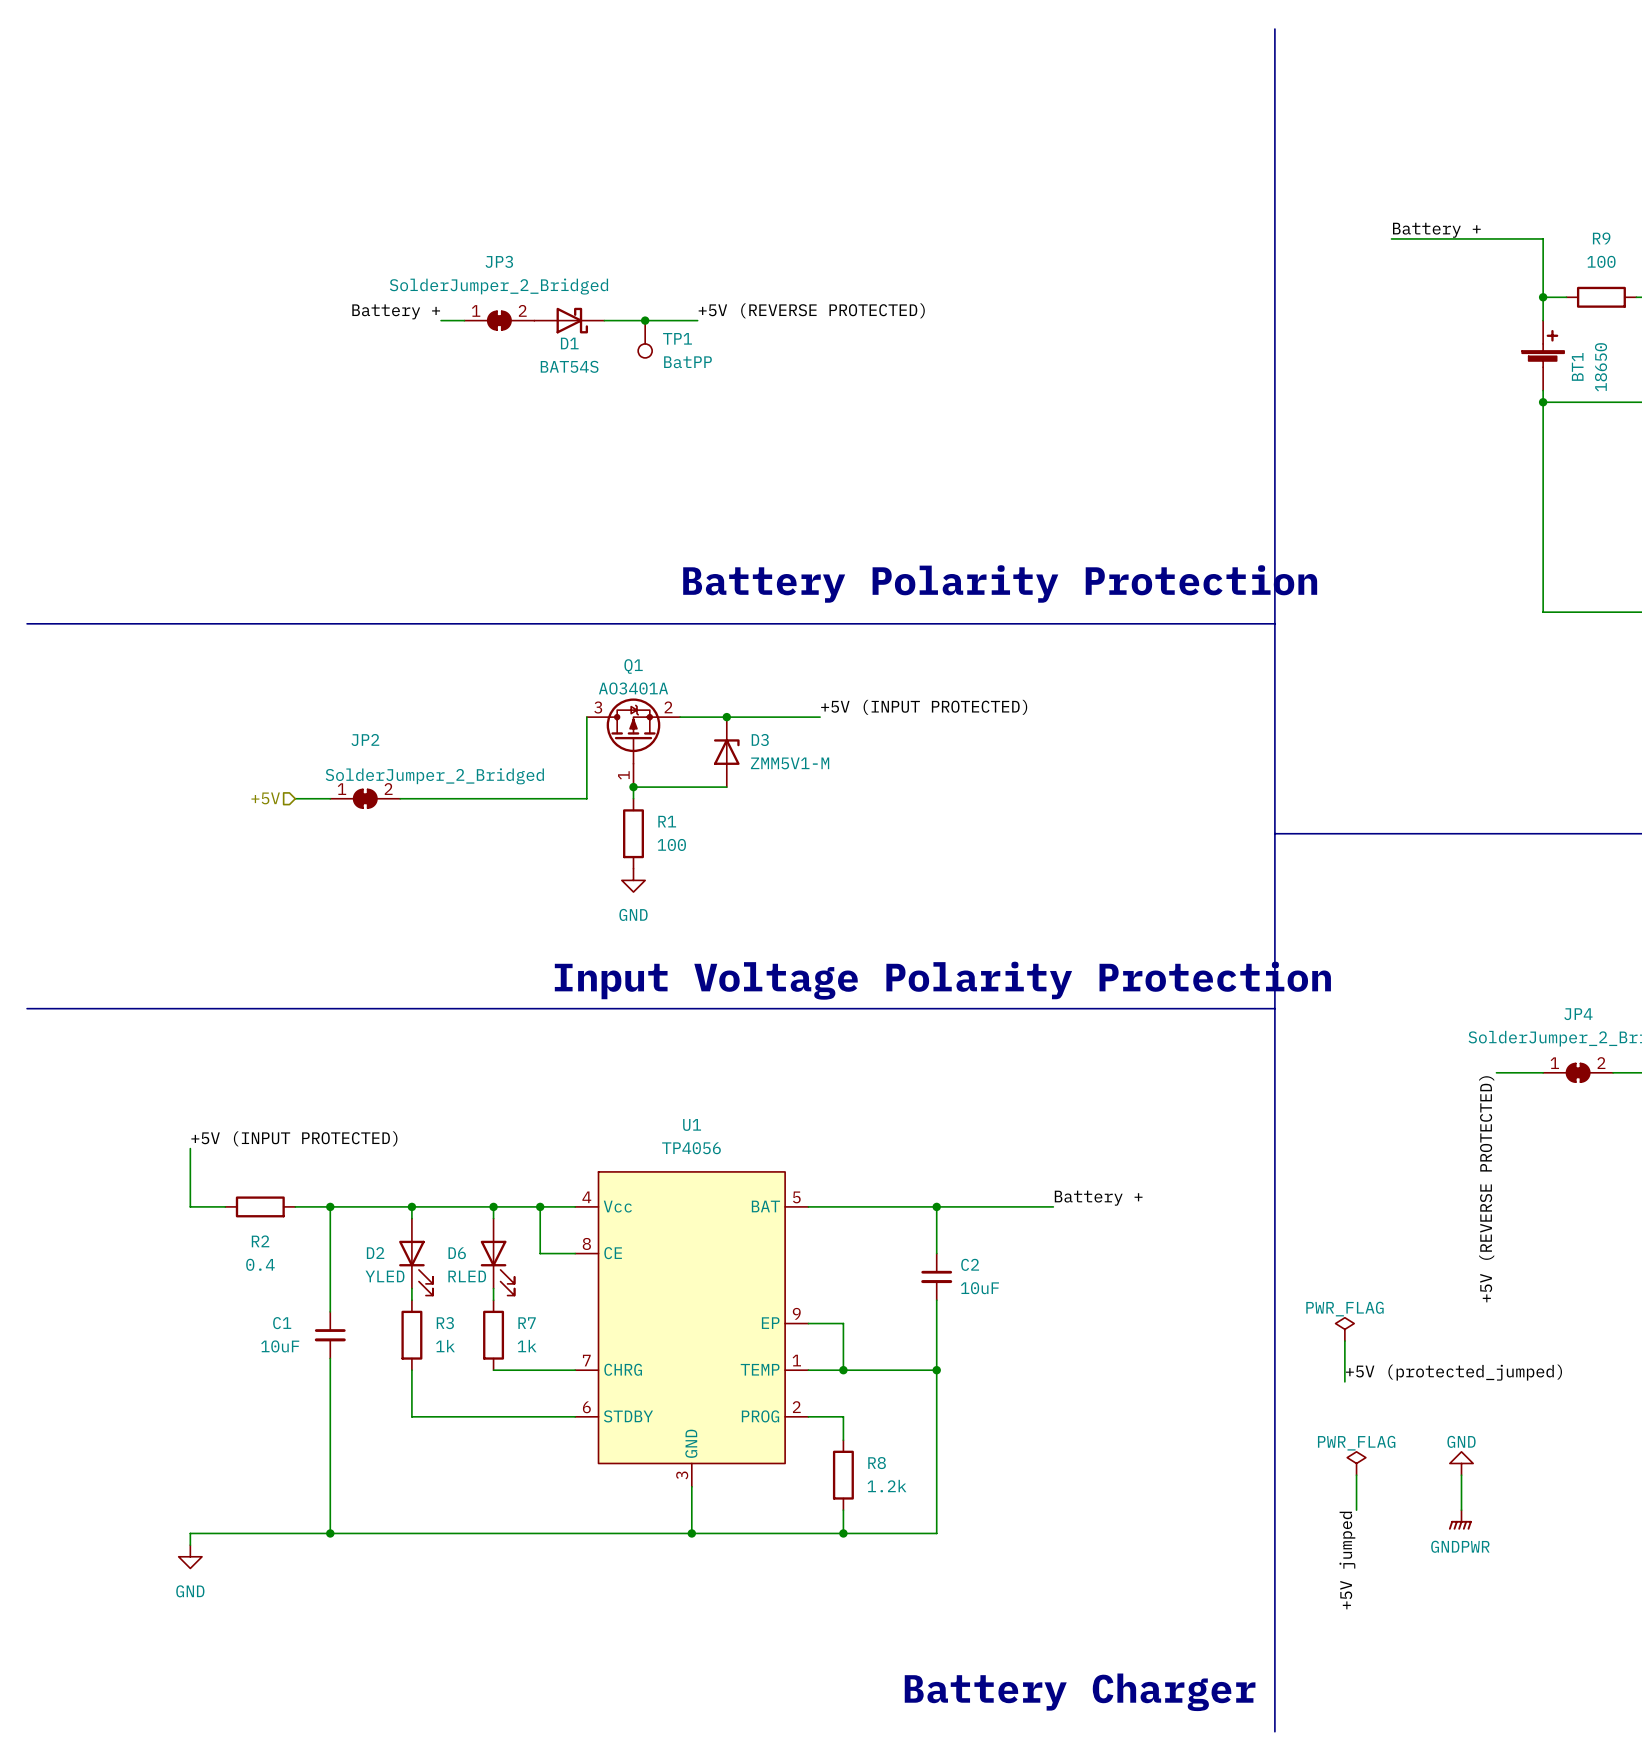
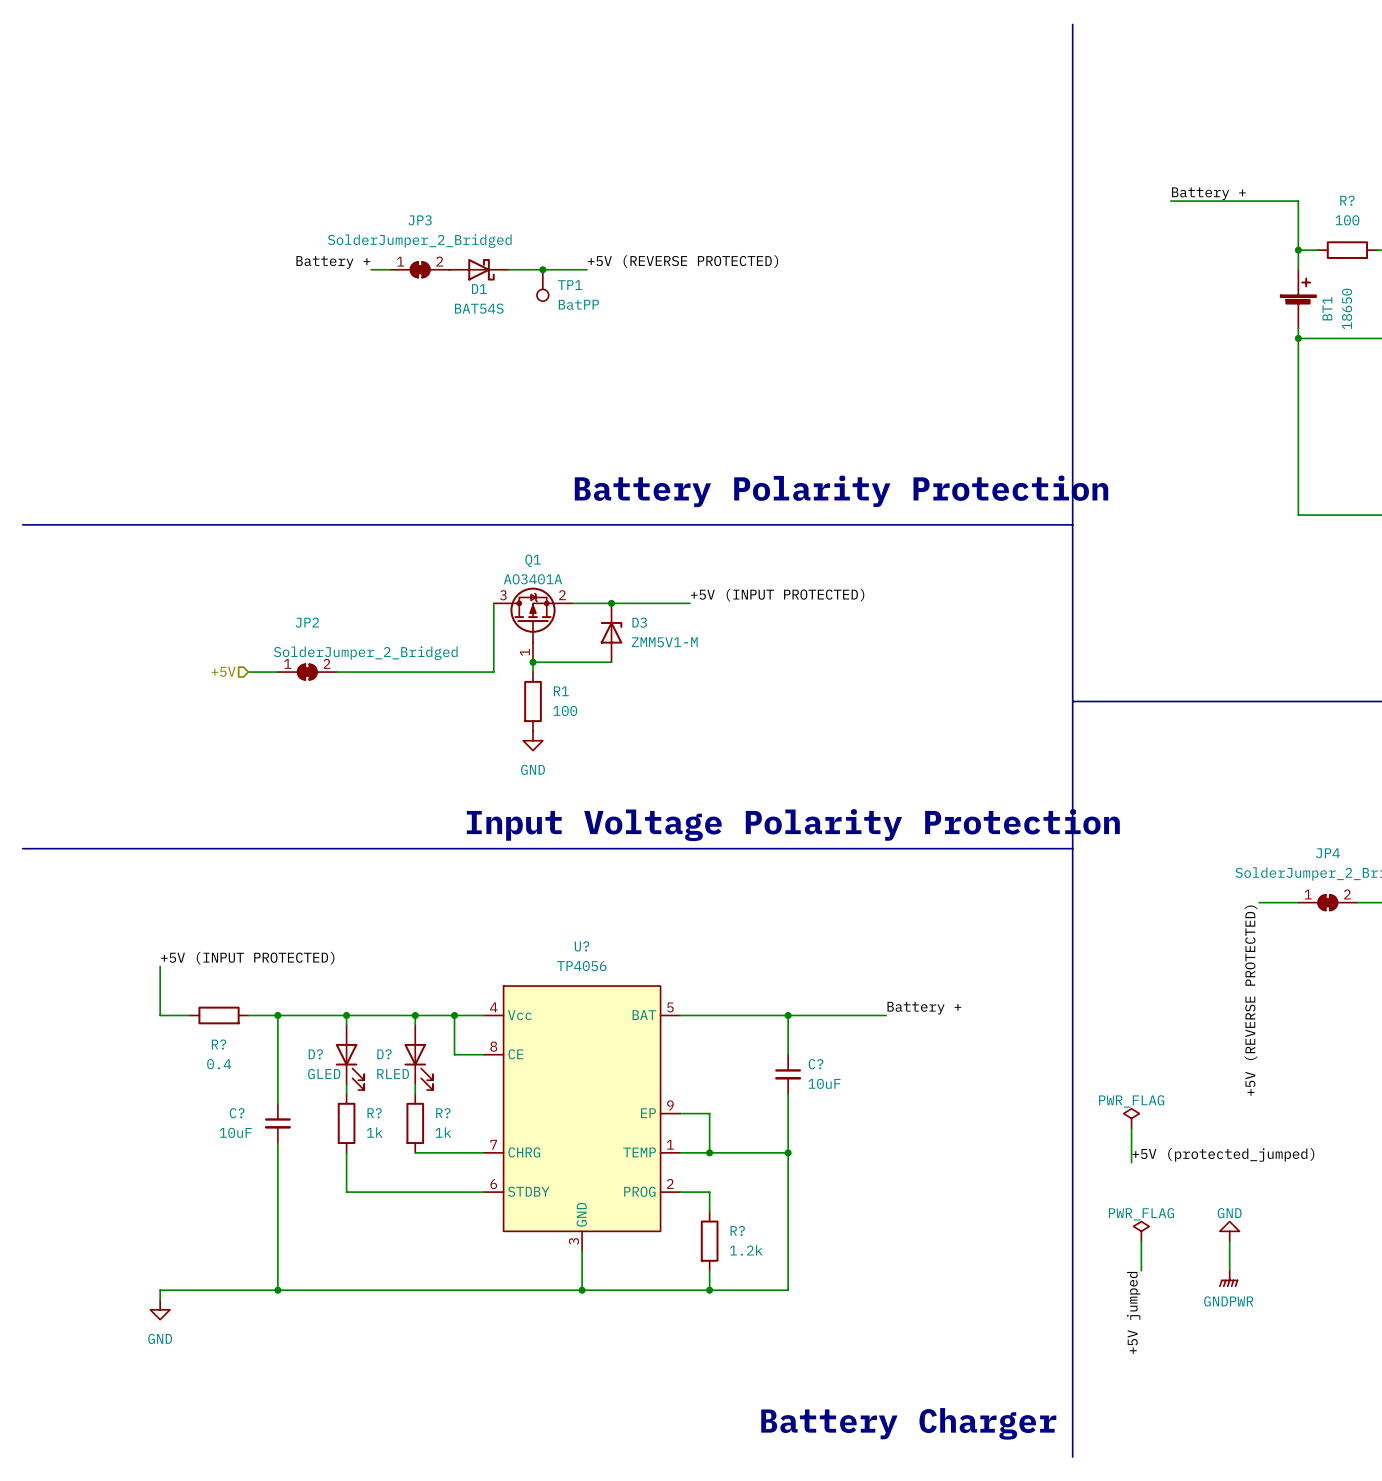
R9 name: R9 (1601, 238) -> R? (1347, 200)
U1 name: U1 (692, 1124) -> U? (582, 946)
R2 name: R2 (260, 1241) -> R? (219, 1044)
D2 name: D2 (375, 1253) -> D? (315, 1054)
D6 name: D6 (457, 1253) -> D? (384, 1054)
C2 name: C2 (970, 1264) -> C? (816, 1064)
D2 value: YLED (385, 1276) -> GLED (324, 1073)
C1 name: C1 (282, 1323) -> C? (237, 1113)
R3 name: R3 (445, 1323) -> R? (374, 1113)
R7 name: R7 (527, 1323) -> R? (443, 1113)
R8 name: R8 (877, 1463) -> R? (737, 1230)

